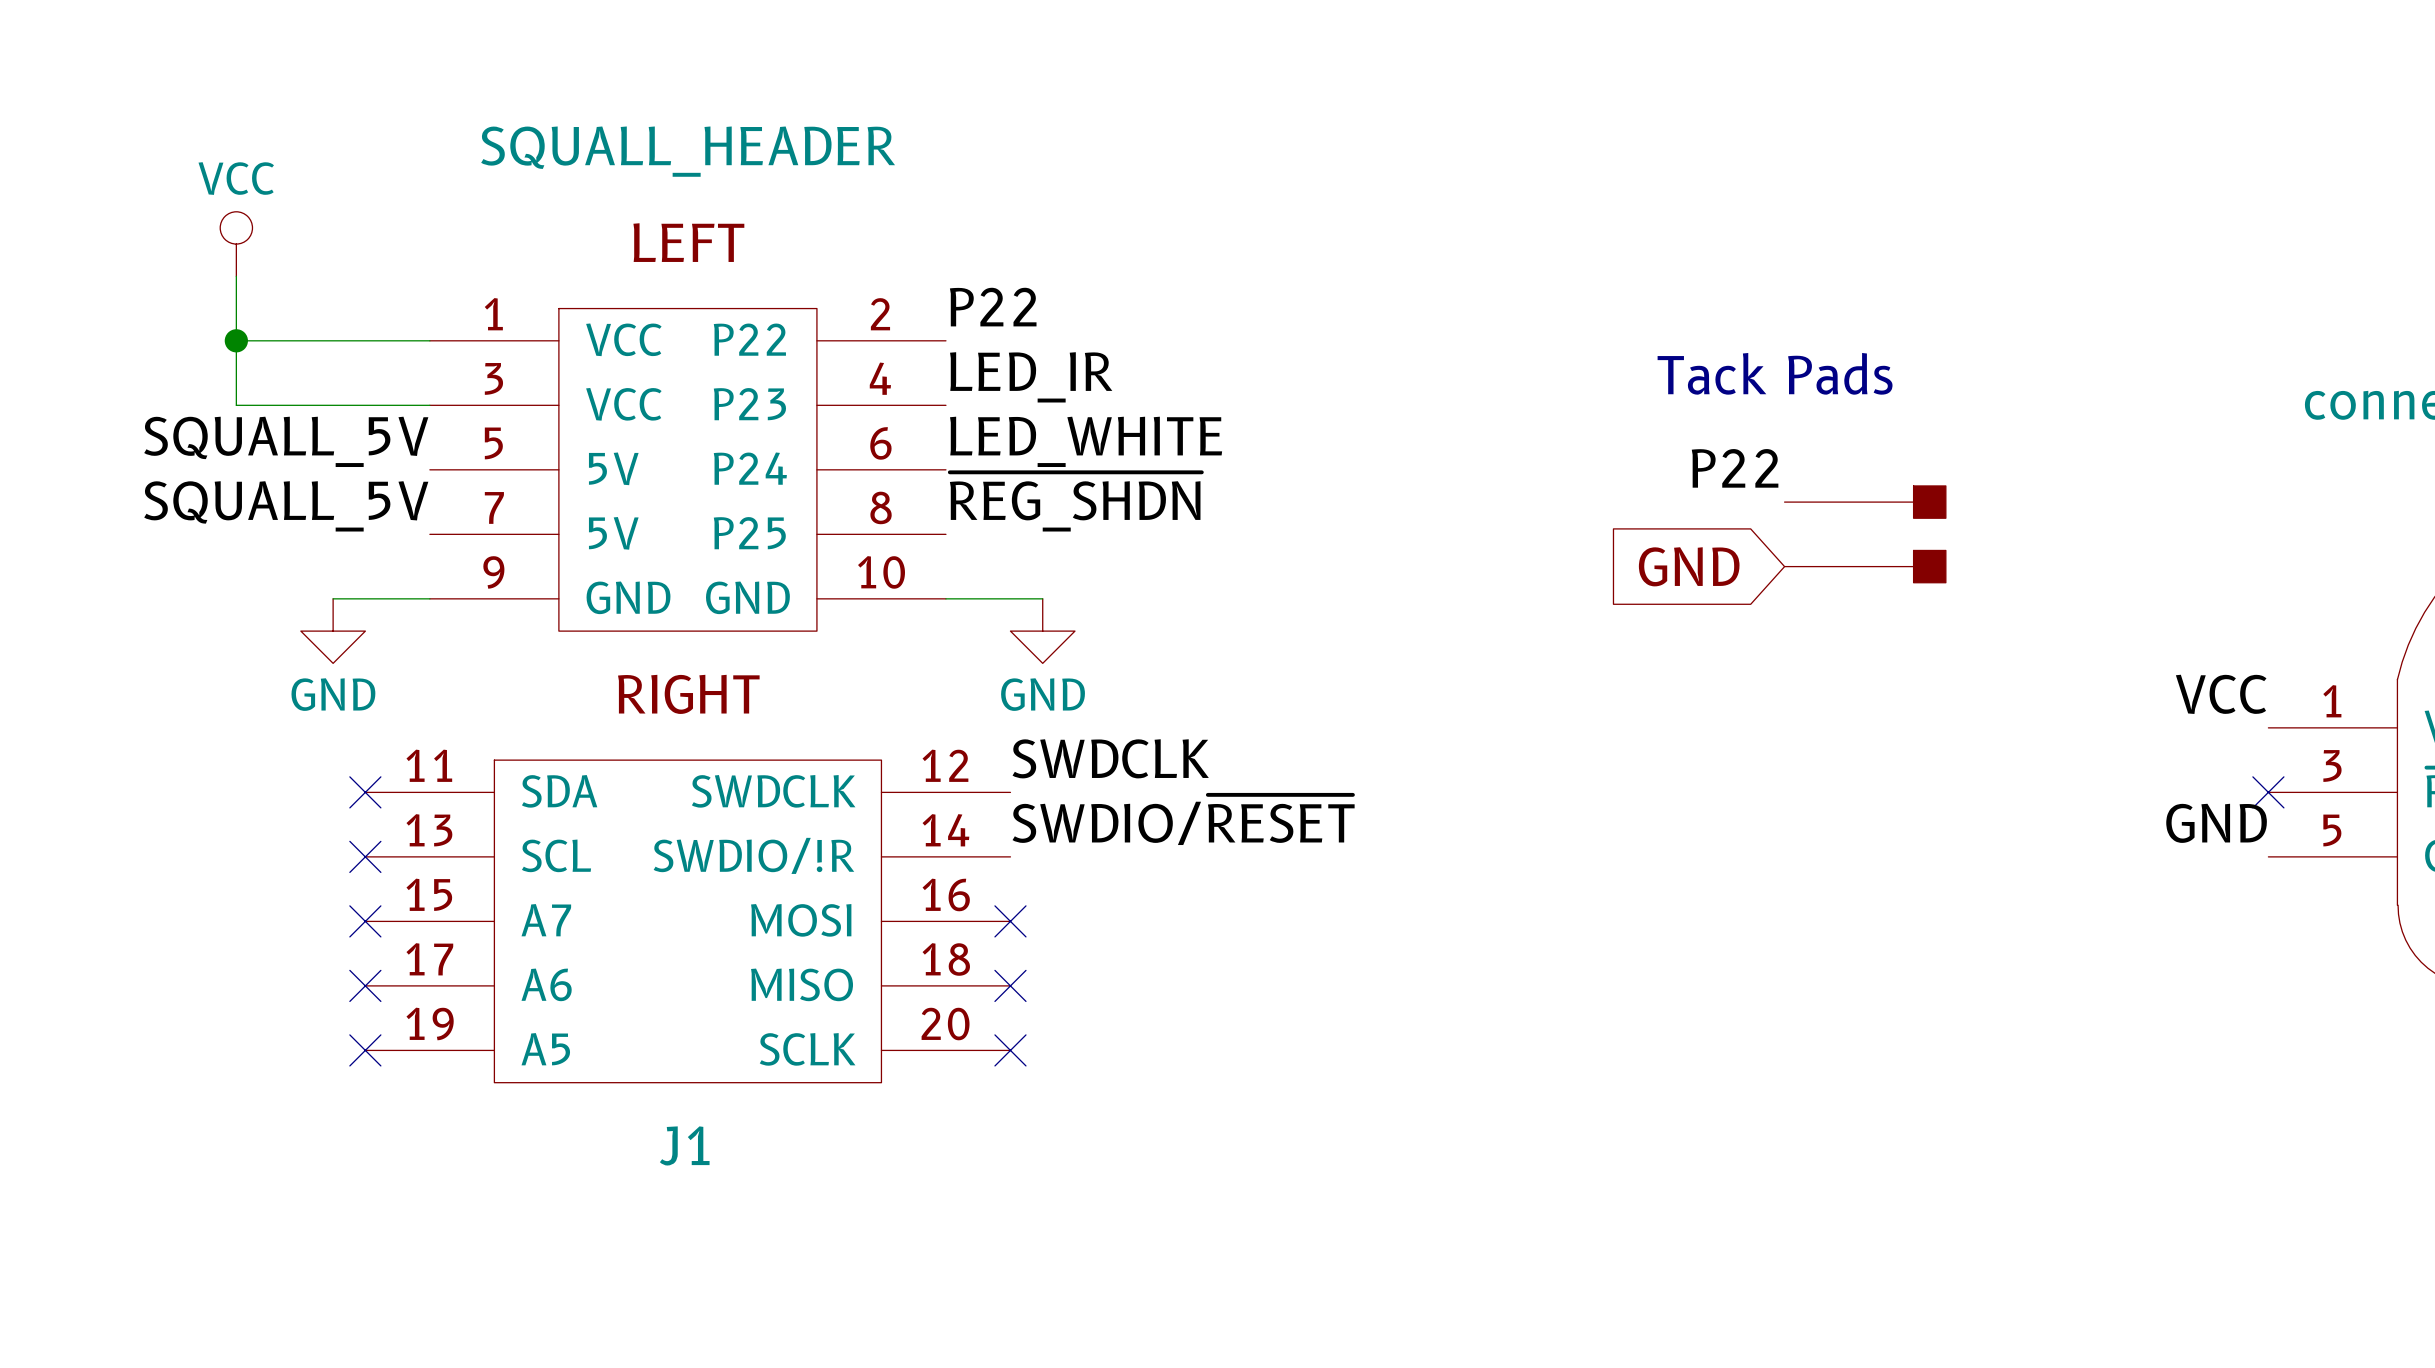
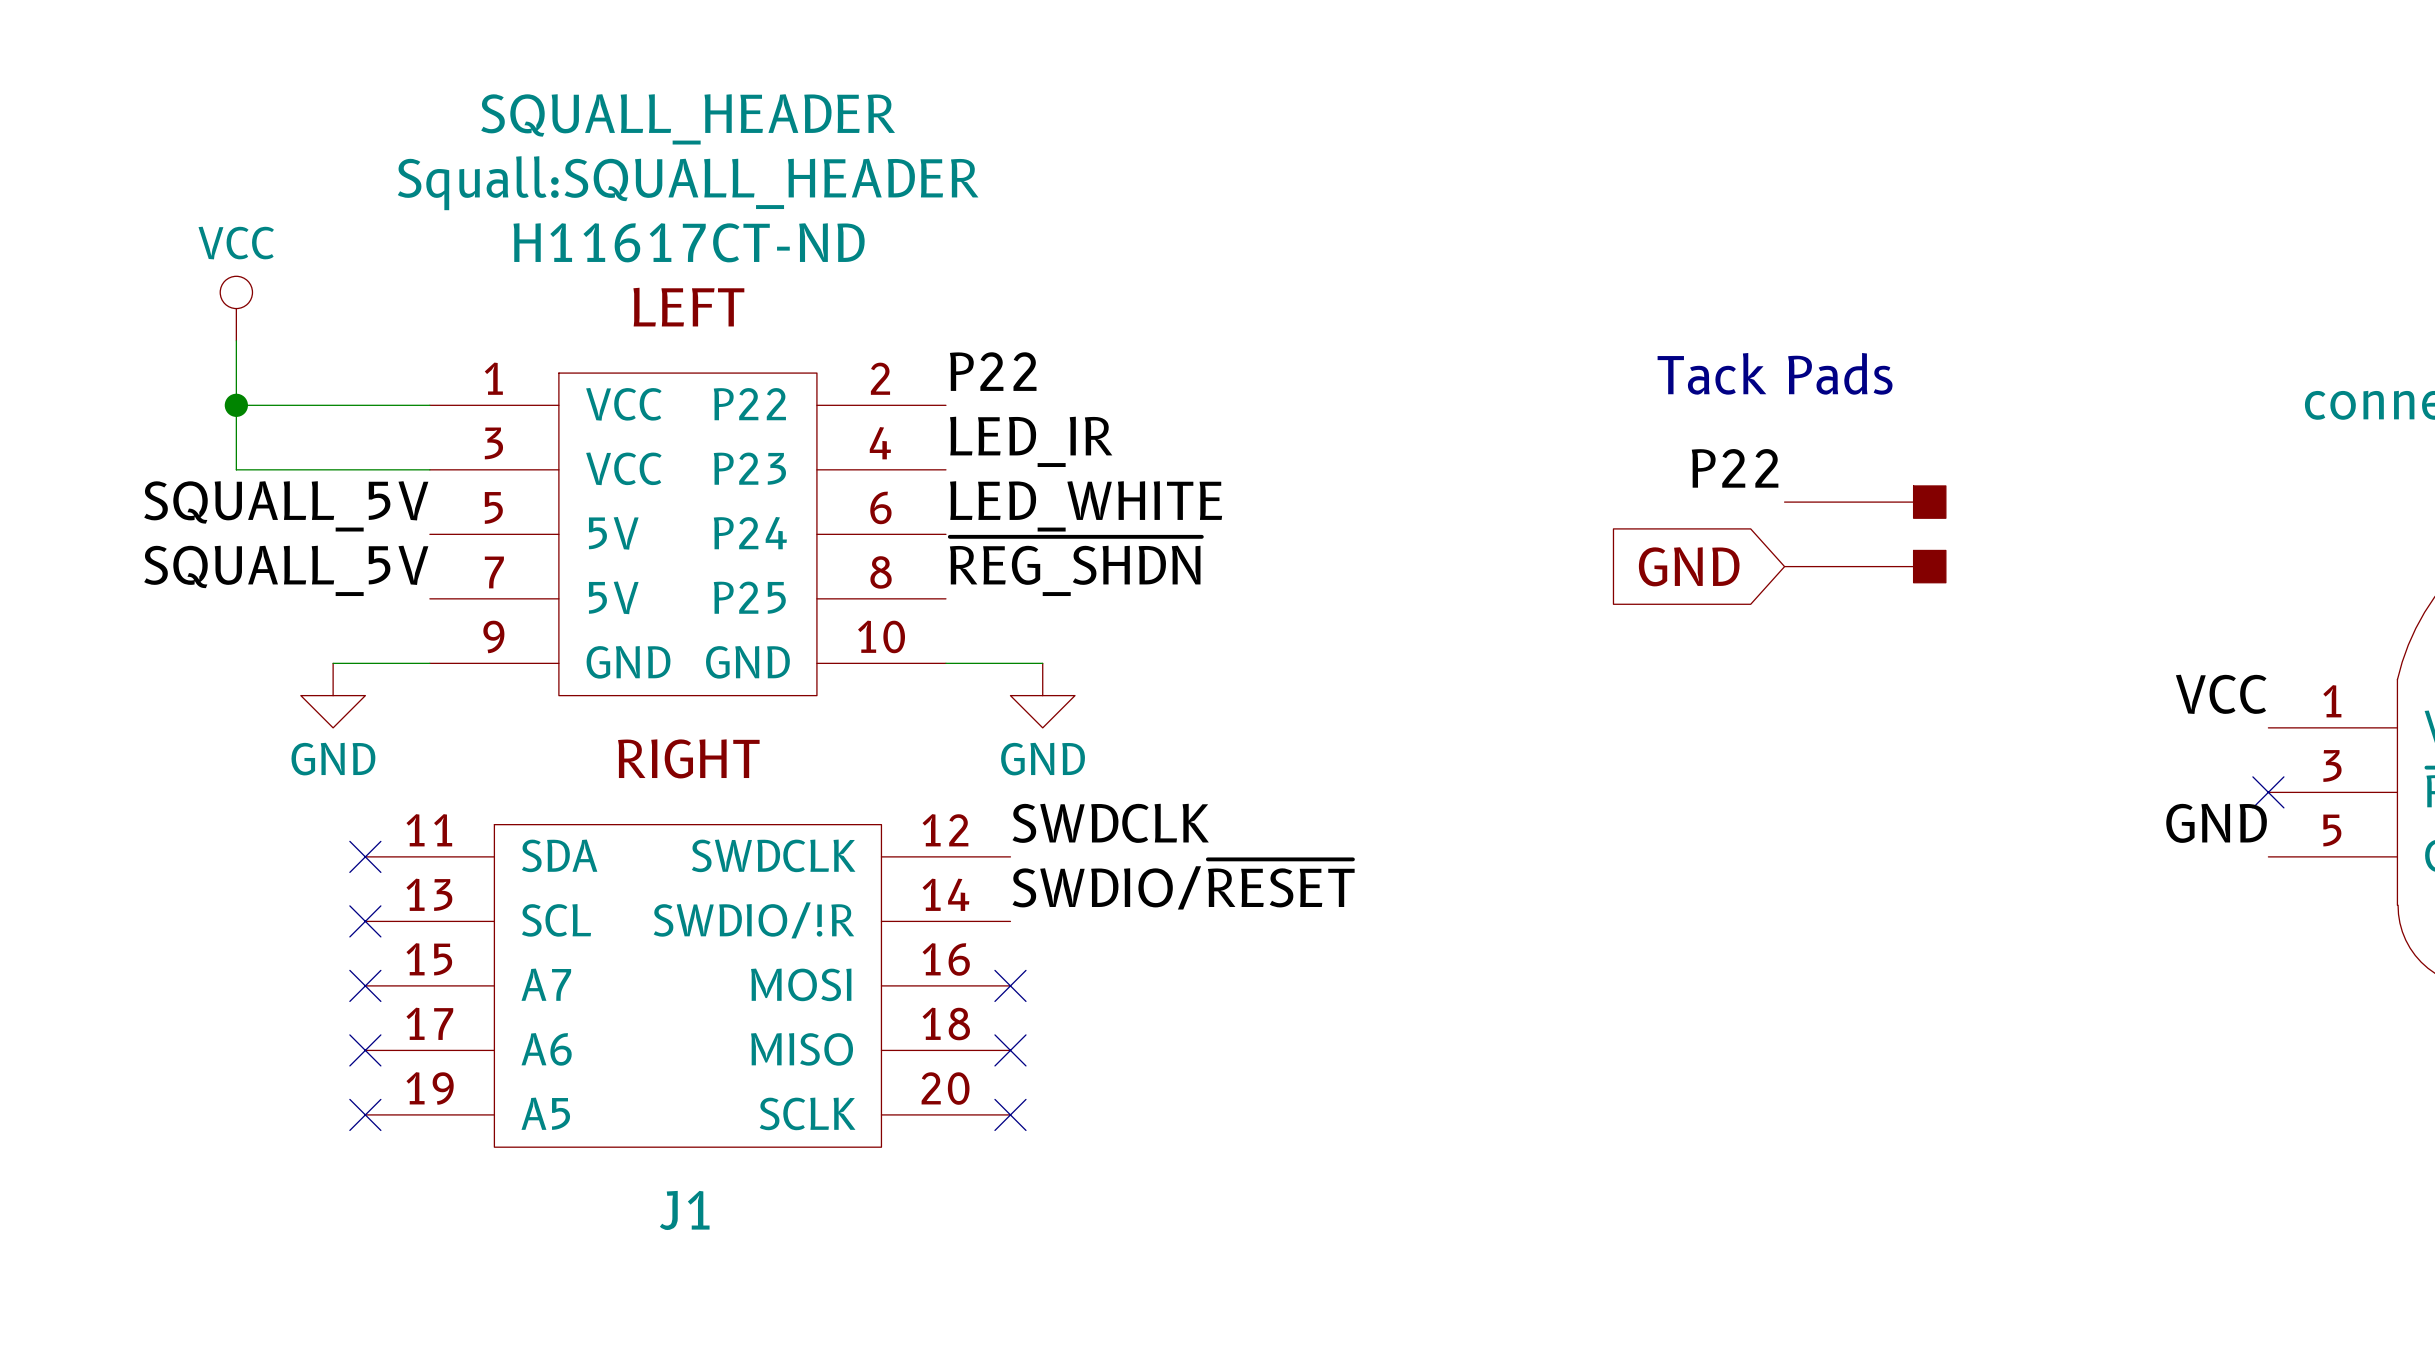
J1 value position: SQUALL_HEADER (688, 151) -> SQUALL_HEADER (688, 119)
J1 text: none -> Squall:SQUALL_HEADER (688, 183)
J1 text: none -> H11617CT-ND (689, 242)
power symbol position: VCC (236, 244) -> VCC (236, 308)
wire: (236, 276) (236, 340) (429, 340) -> (236, 405) (236, 469) (429, 469)
label: P22 (993, 307) -> none
junction position: (236, 340) -> (236, 405)
label: LED_IR (1031, 377) -> P22 (993, 371)
label position: SQUALL_5V (286, 441) -> SQUALL_5V (286, 570)
label: LED_WHITE (1086, 441) -> LED_IR (1031, 441)
label: ~{REG_SHDN} (1075, 501) -> LED_WHITE (1086, 506)
label: none -> ~{REG_SHDN} (1075, 566)
wire: (333, 598) (429, 598) -> (333, 663) (429, 663)
wire: (945, 598) (1042, 598) -> (945, 663) (1042, 663)
power symbol position: GND (333, 631) -> GND (333, 695)
power symbol position: GND (1042, 631) -> GND (1042, 695)
J1 position: (687, 695) -> (687, 760)
label: SWDCLK (1110, 758) -> none
no-connect mark: (365, 792) -> none
label: SWDIO/~{RESET} (1183, 819) -> SWDCLK (1110, 823)
label: none -> SWDIO/~{RESET} (1183, 884)
no-connect mark: (1010, 921) -> none
no-connect mark: none -> (365, 1114)
no-connect mark: none -> (1010, 1114)

